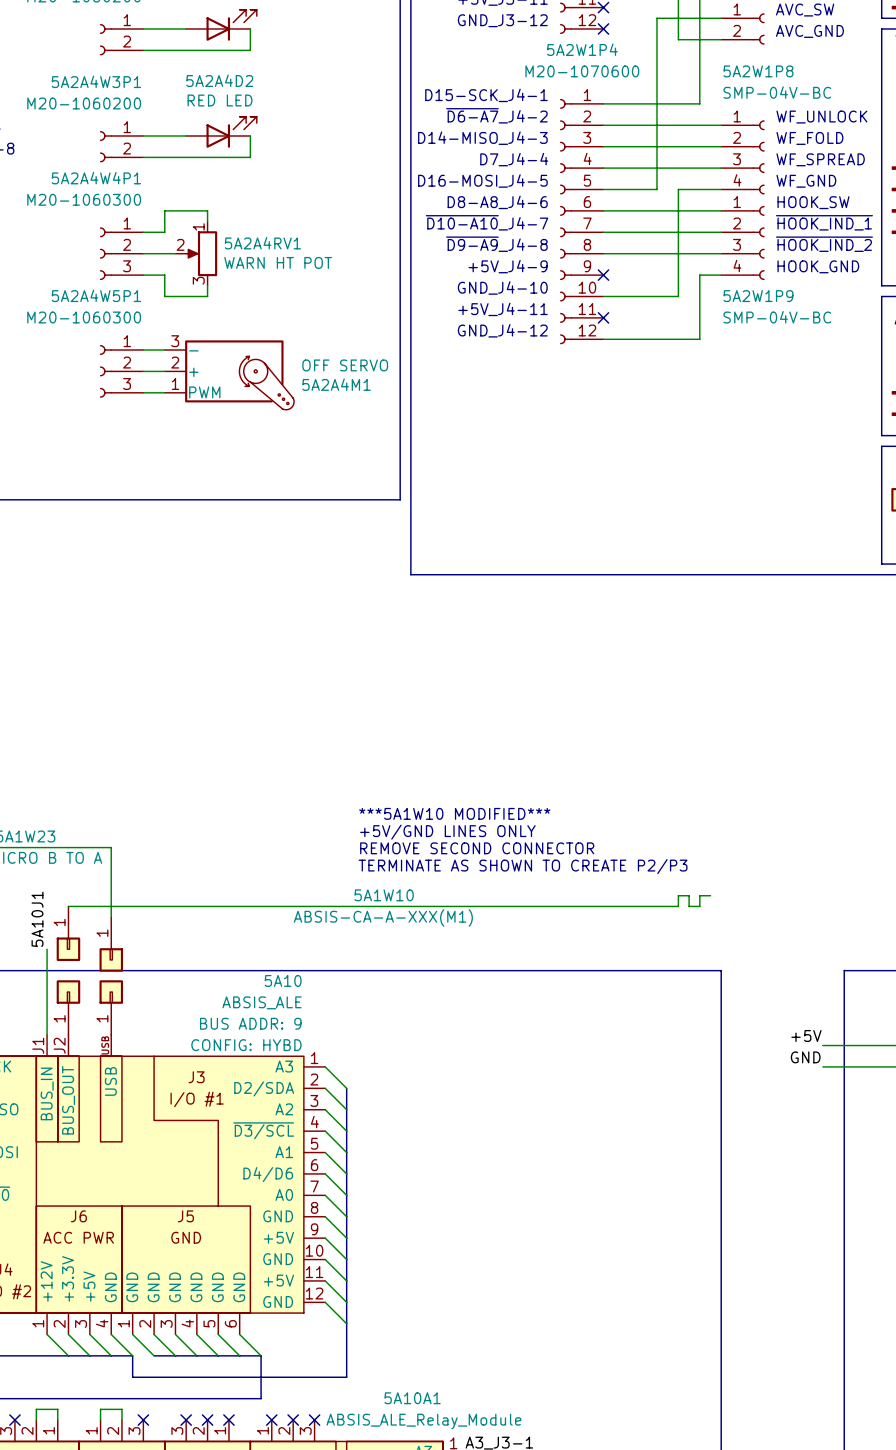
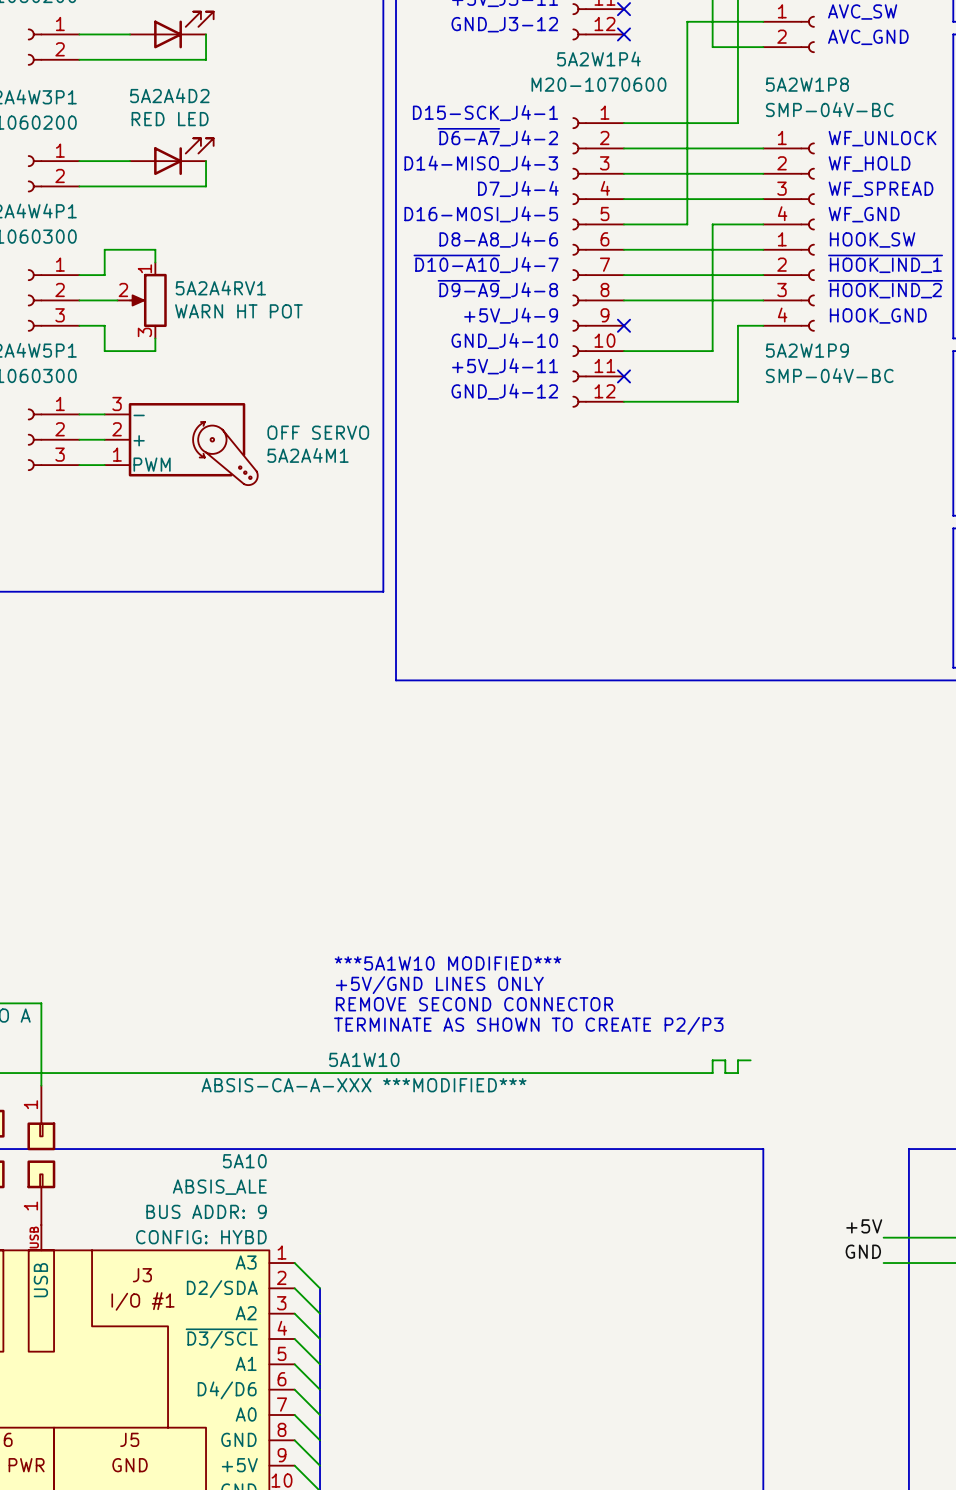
text: WF_FOLD (809, 138) -> WF_HOLD (869, 164)
5A1W10 value: ABSIS-CA-A-XXX(M1) (383, 918) -> ABSIS-CA-A-XXX ***MODIFIED*** (364, 1085)

